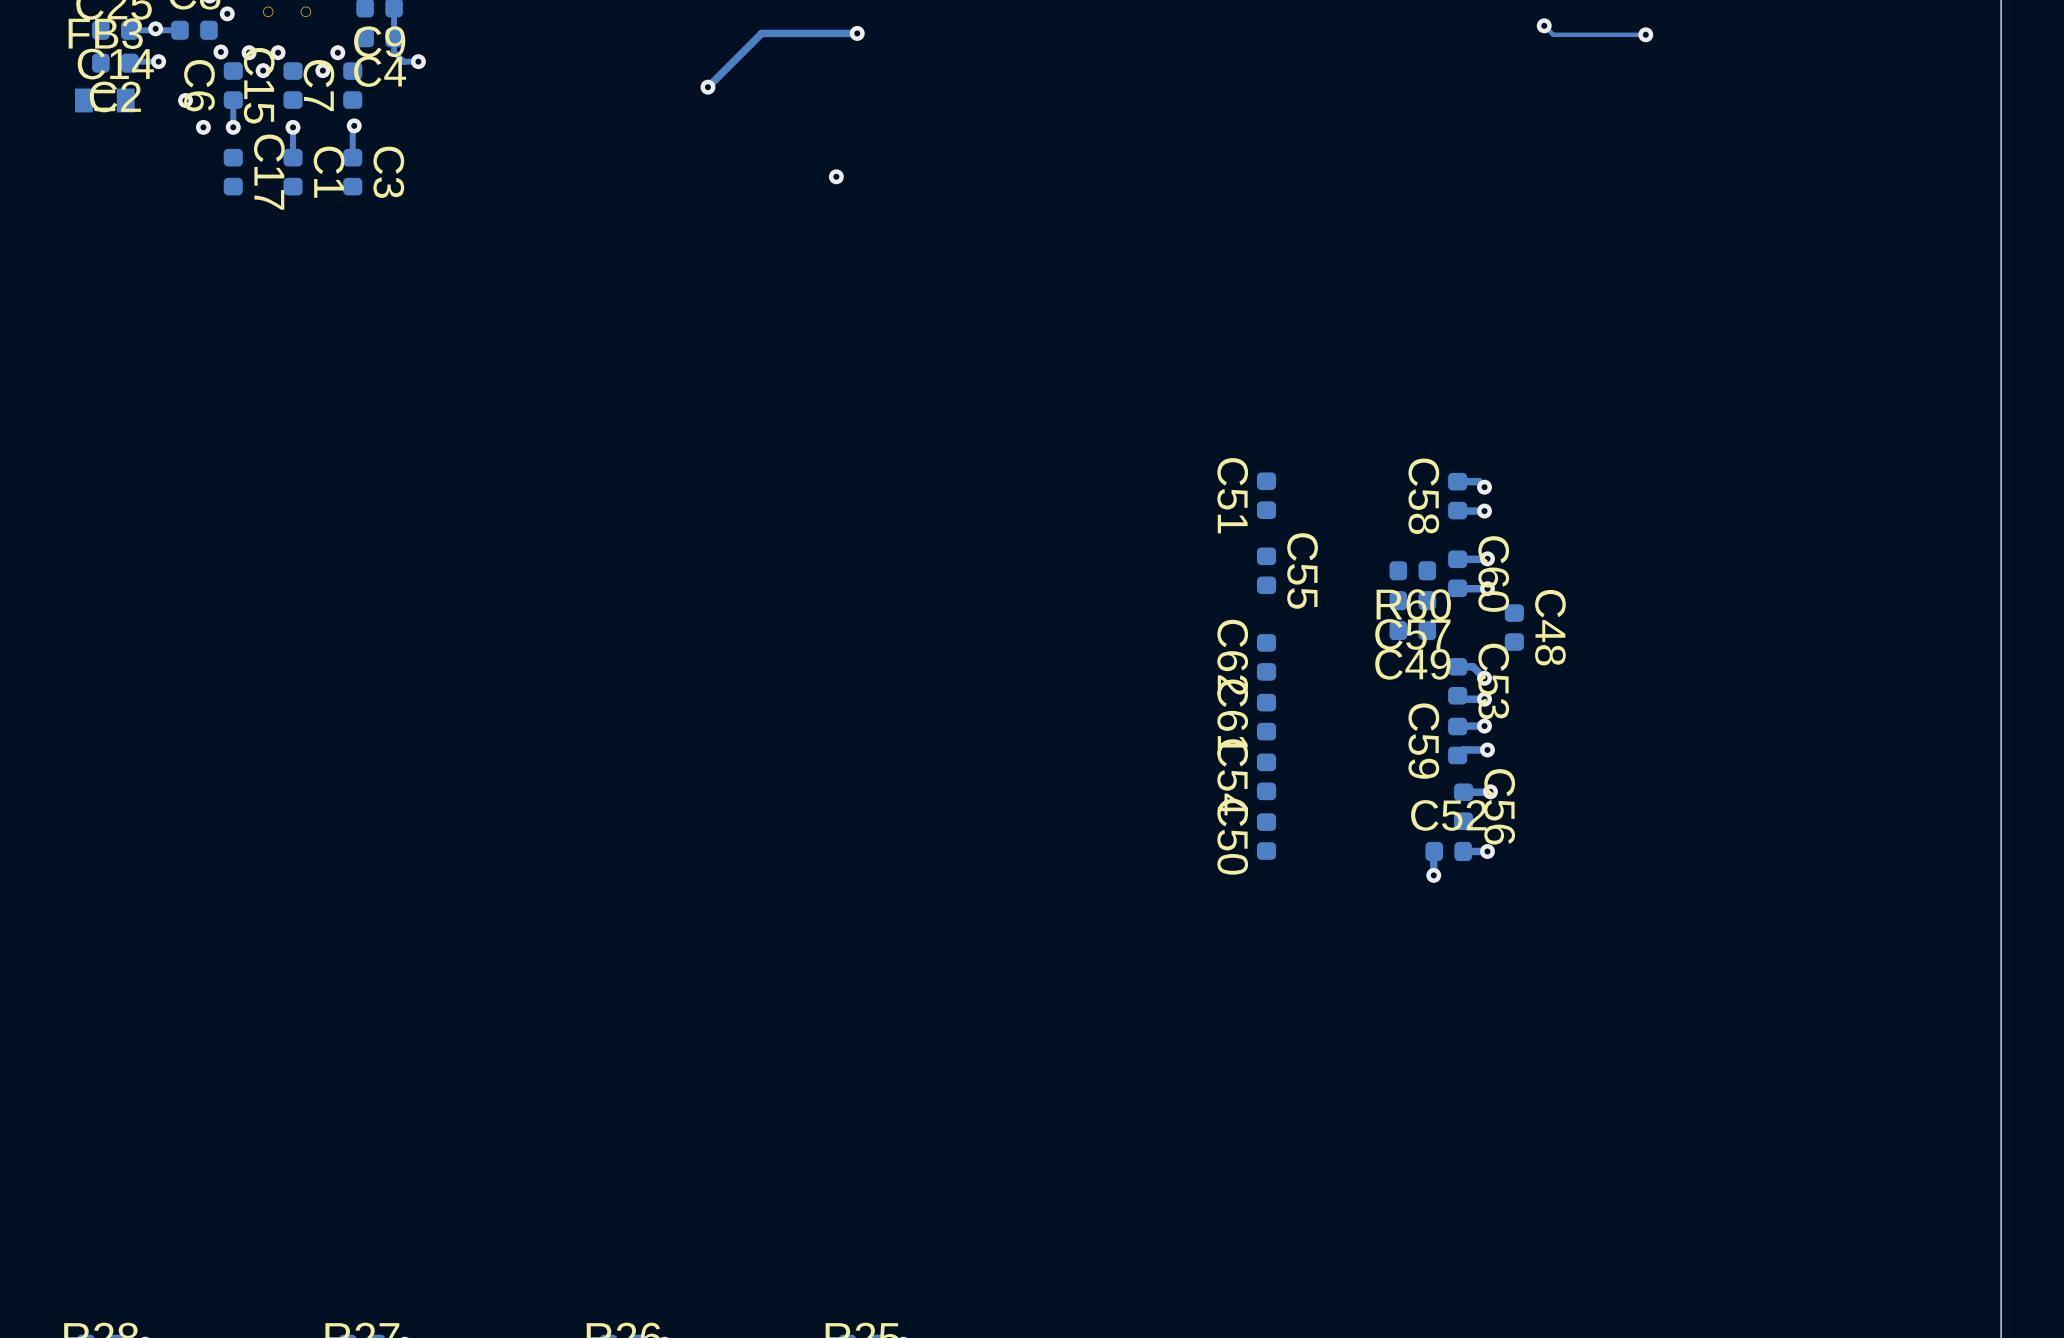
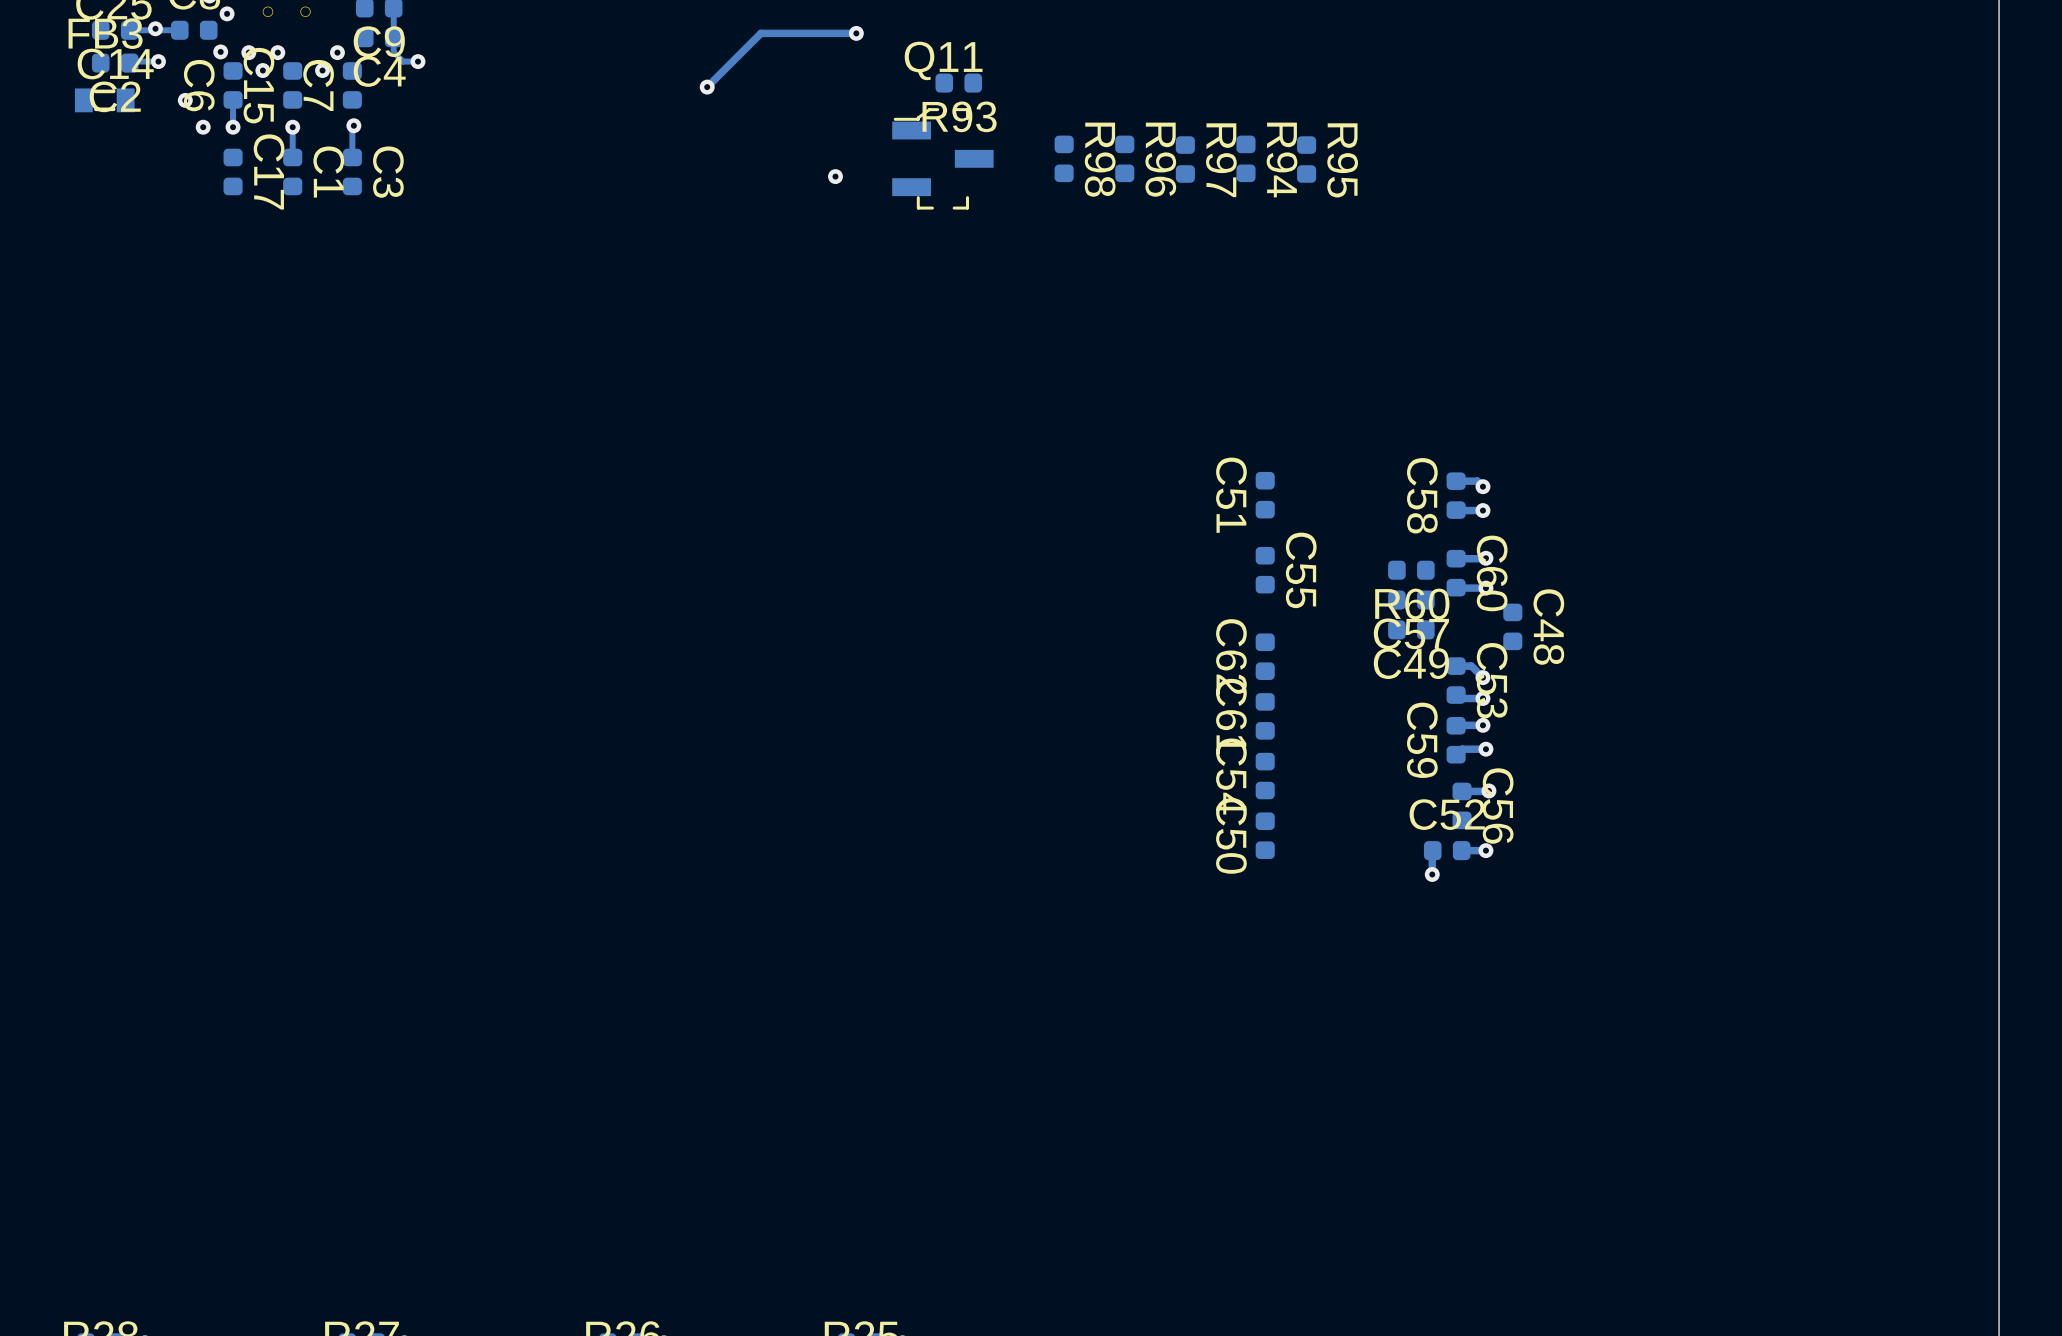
track: (1544, 25) (1553, 34) (1645, 34) -> none
via: (1544, 25) -> none
via: (1645, 34) -> none
R93: none -> (958, 83)
Q11: none -> (942, 158)
R98: none -> (1064, 158)
R96: none -> (1124, 158)
R97: none -> (1185, 159)
R94: none -> (1245, 158)
R95: none -> (1306, 159)

